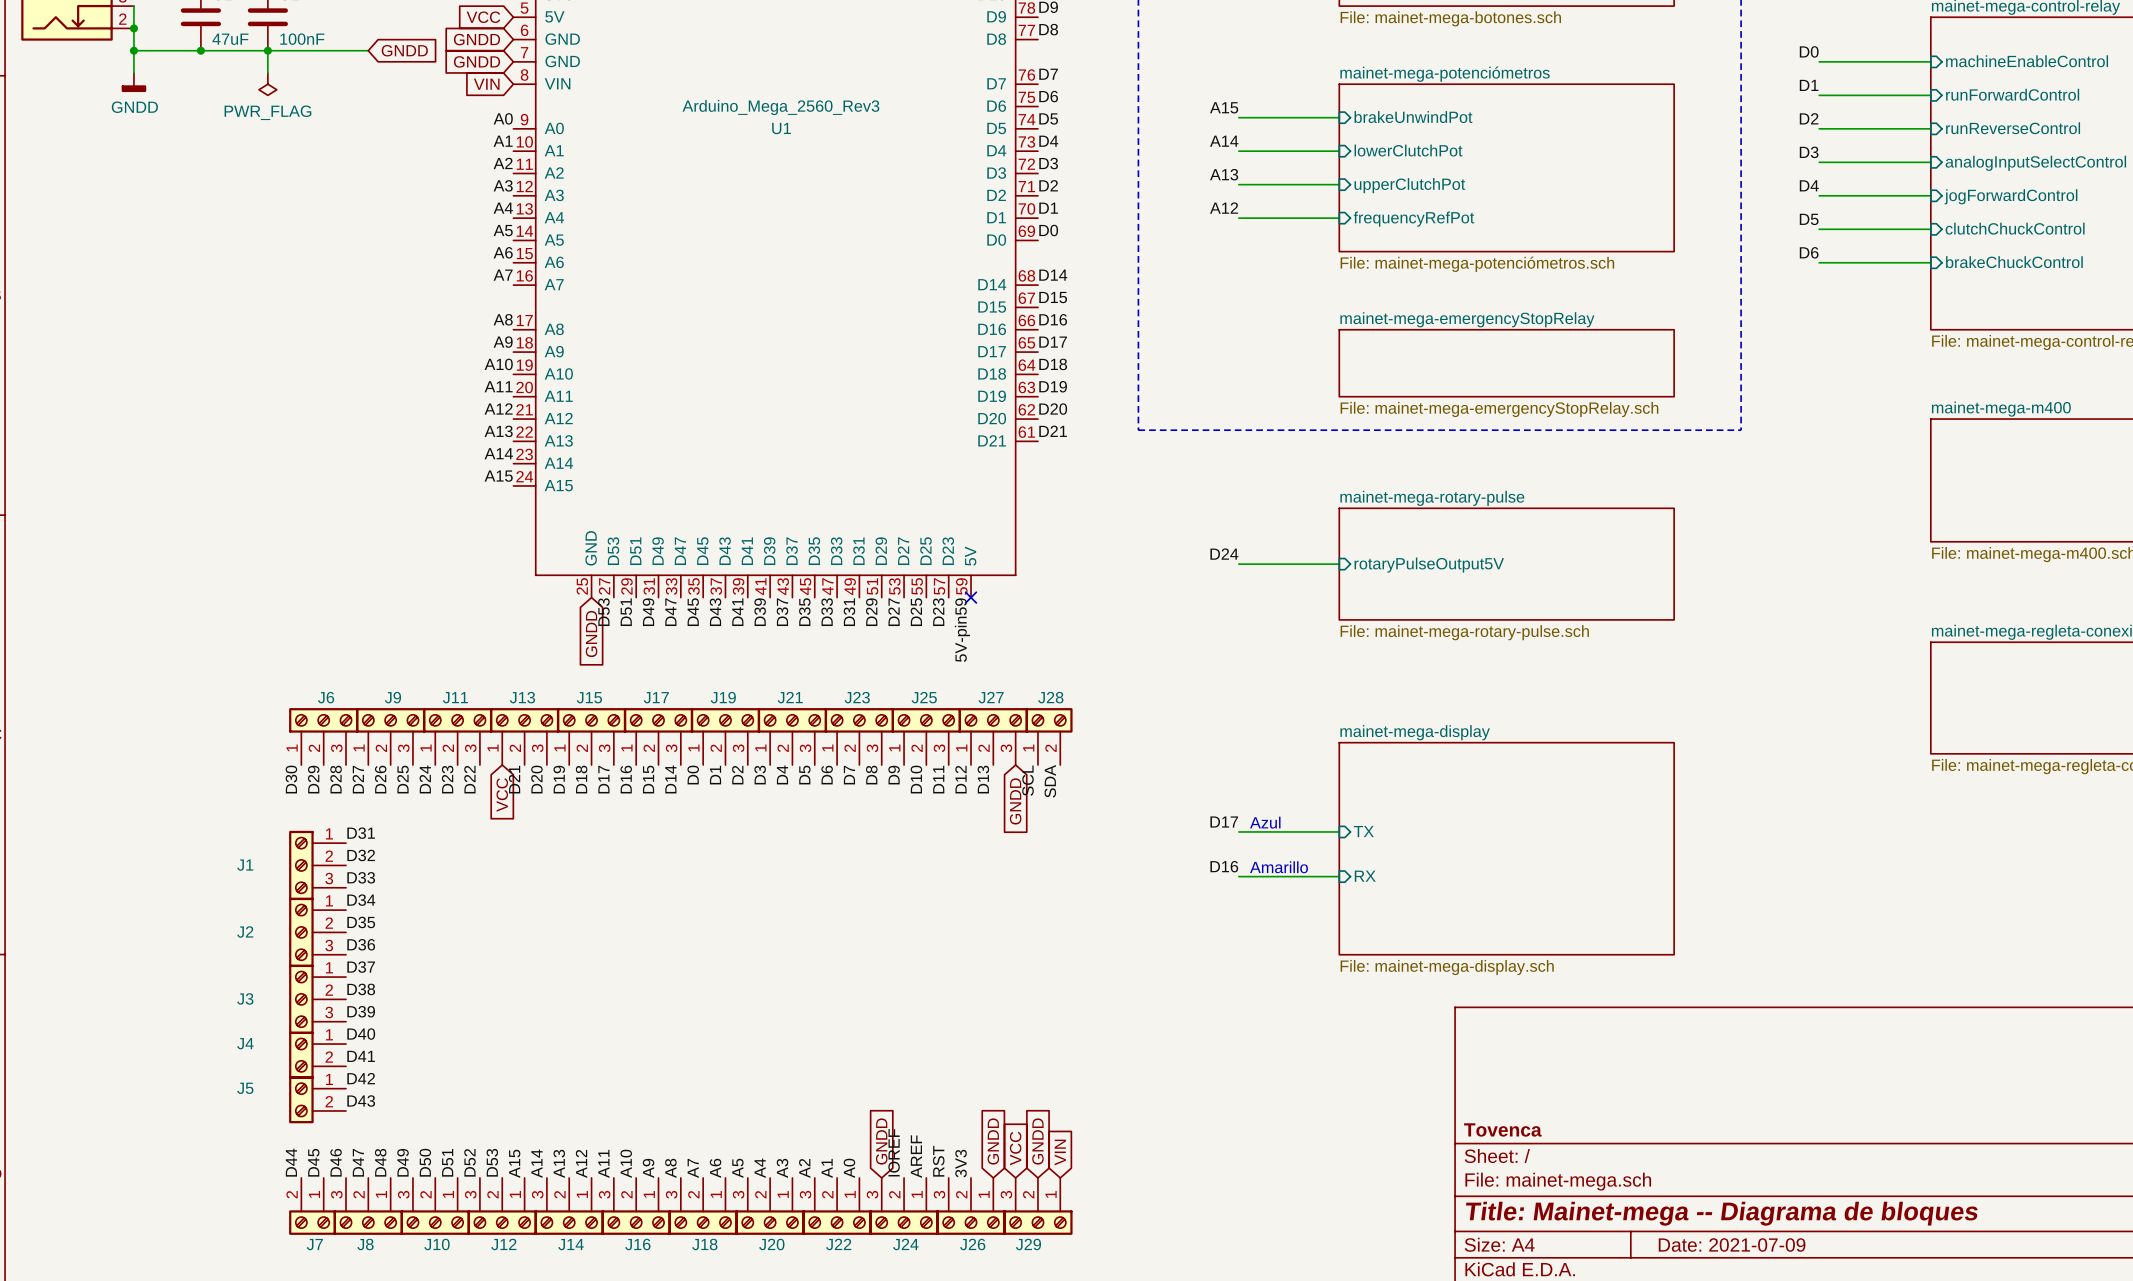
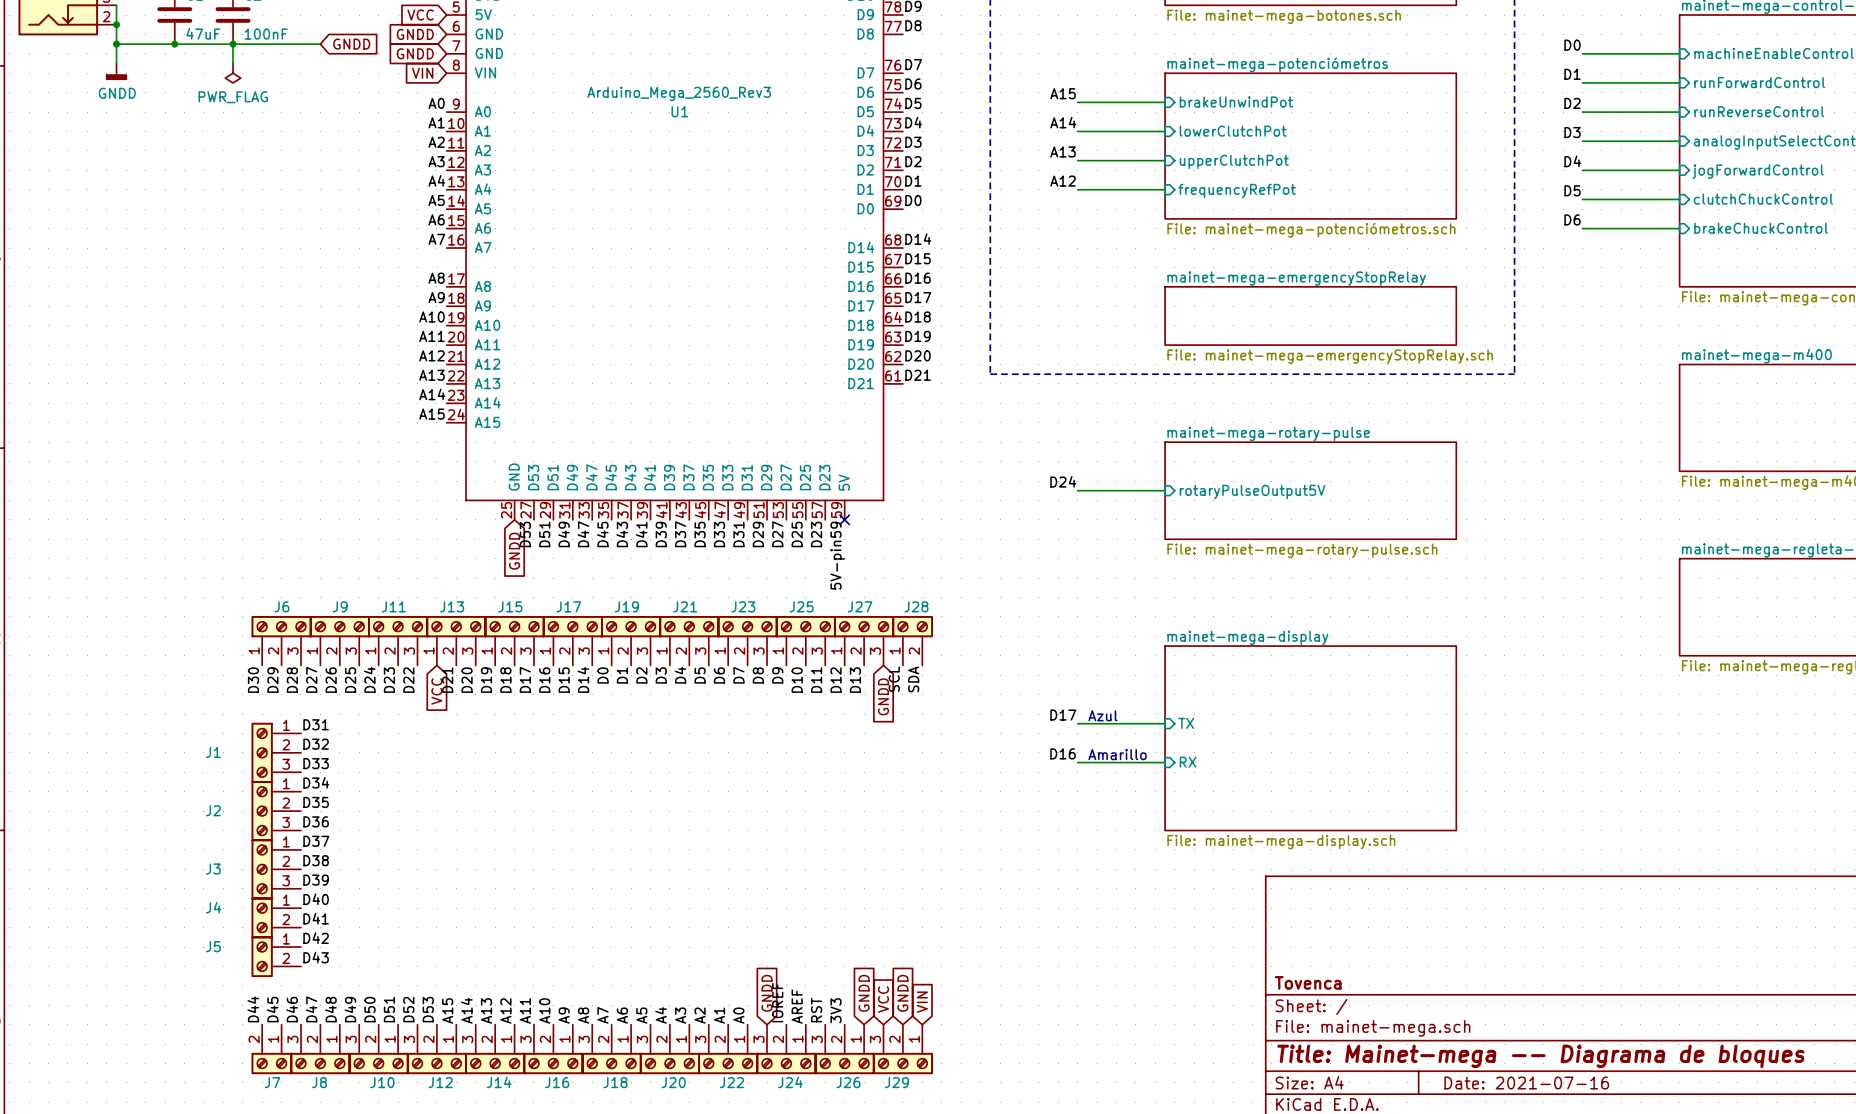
title block: Date: 2021-07-09 (1732, 1245) -> Date: 2021-07-16 (1526, 1083)

